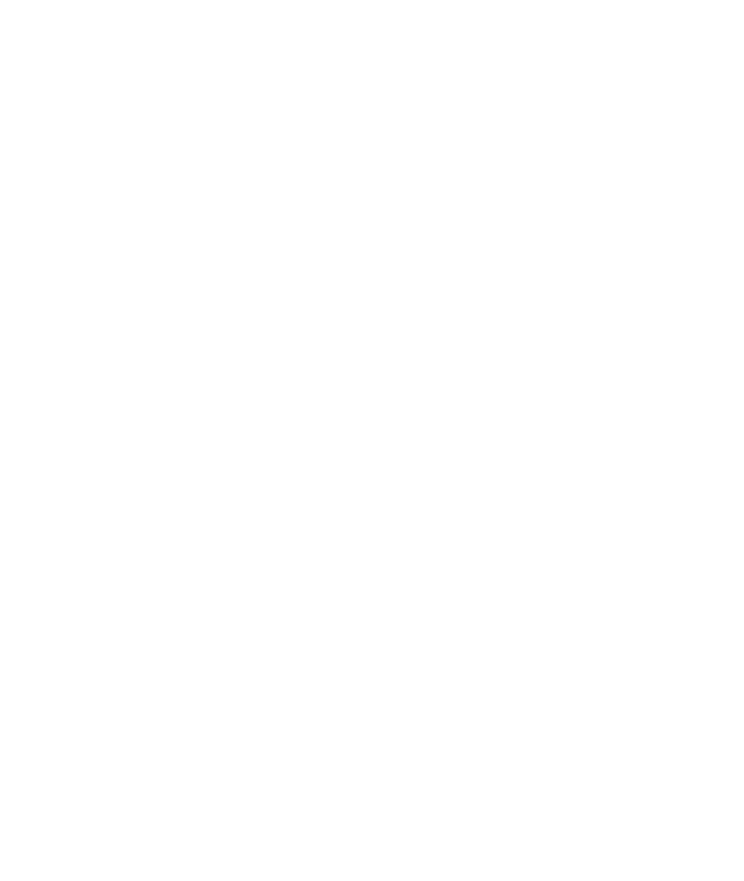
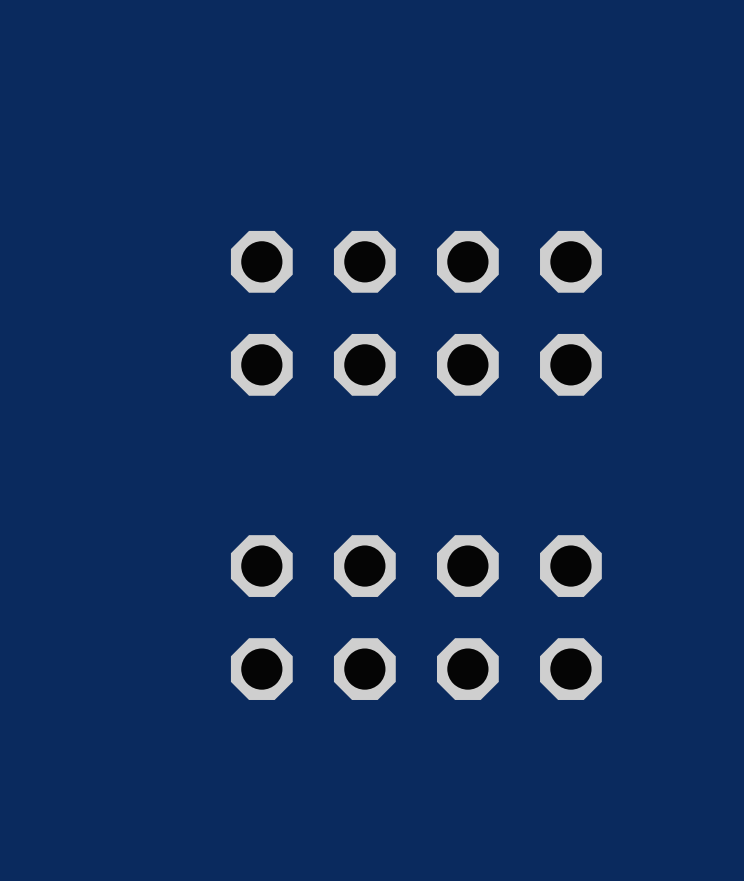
part: none -> (416, 313)
part: none -> (416, 617)

